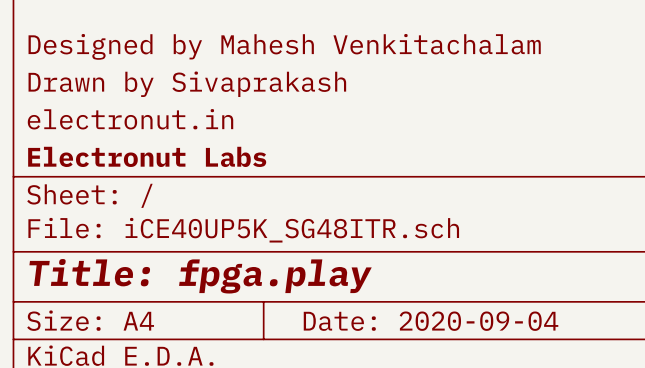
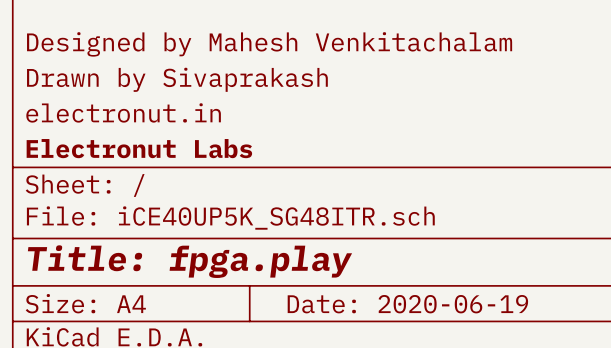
title block: Date: 2020-09-04 (431, 321) -> Date: 2020-06-19 (407, 304)

